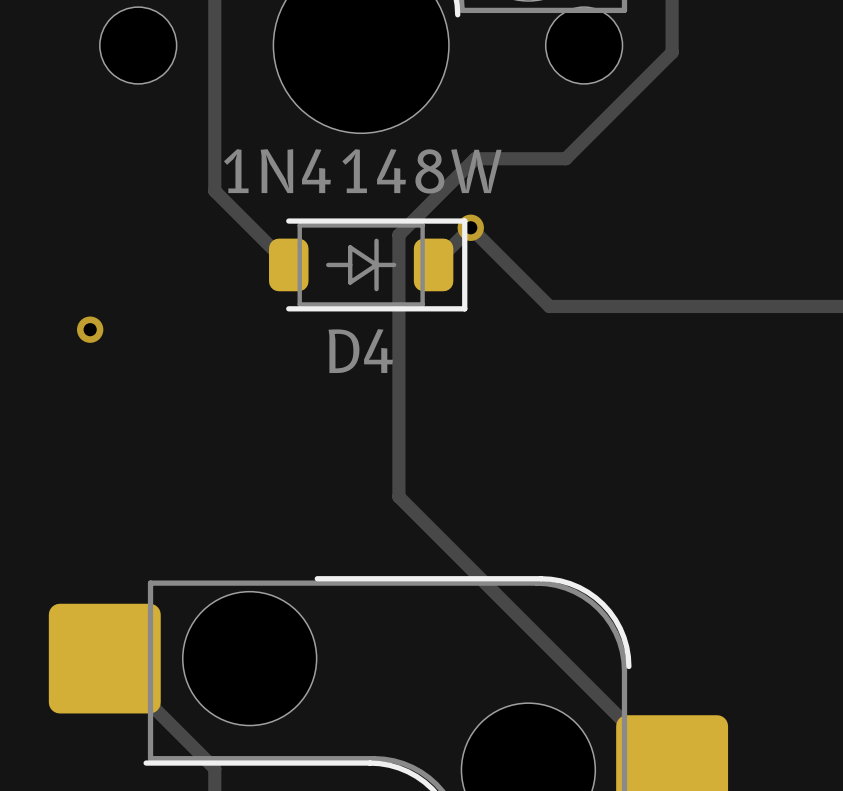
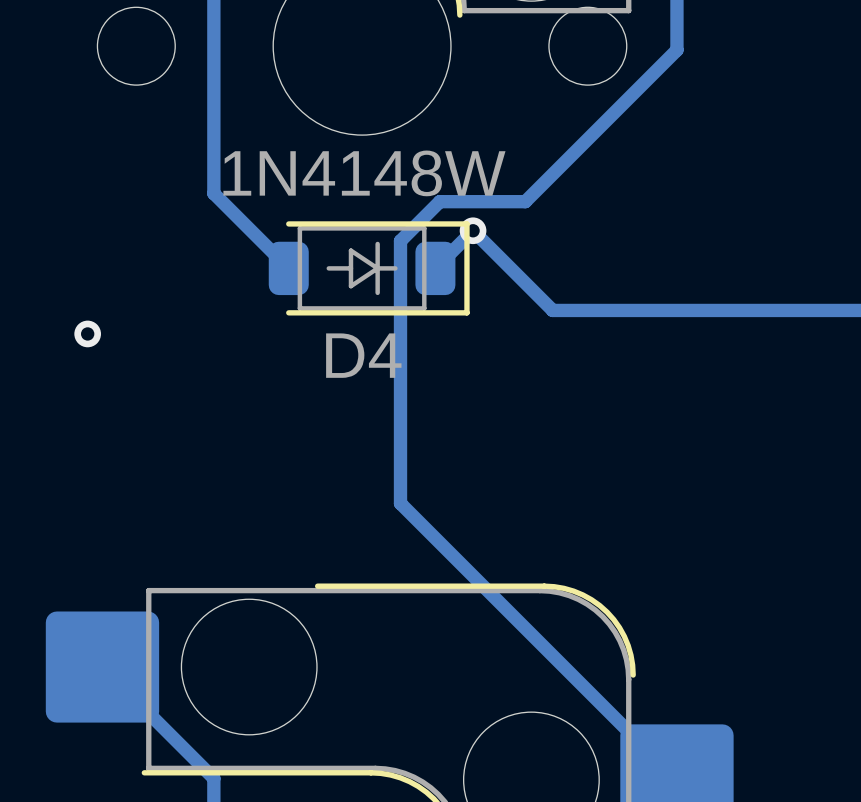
track: (672, 49) (672, 52) (565, 158) (475, 158) (398, 235) (398, 496) -> (676, 50) (525, 201) (439, 201) (400, 240) (400, 503)

